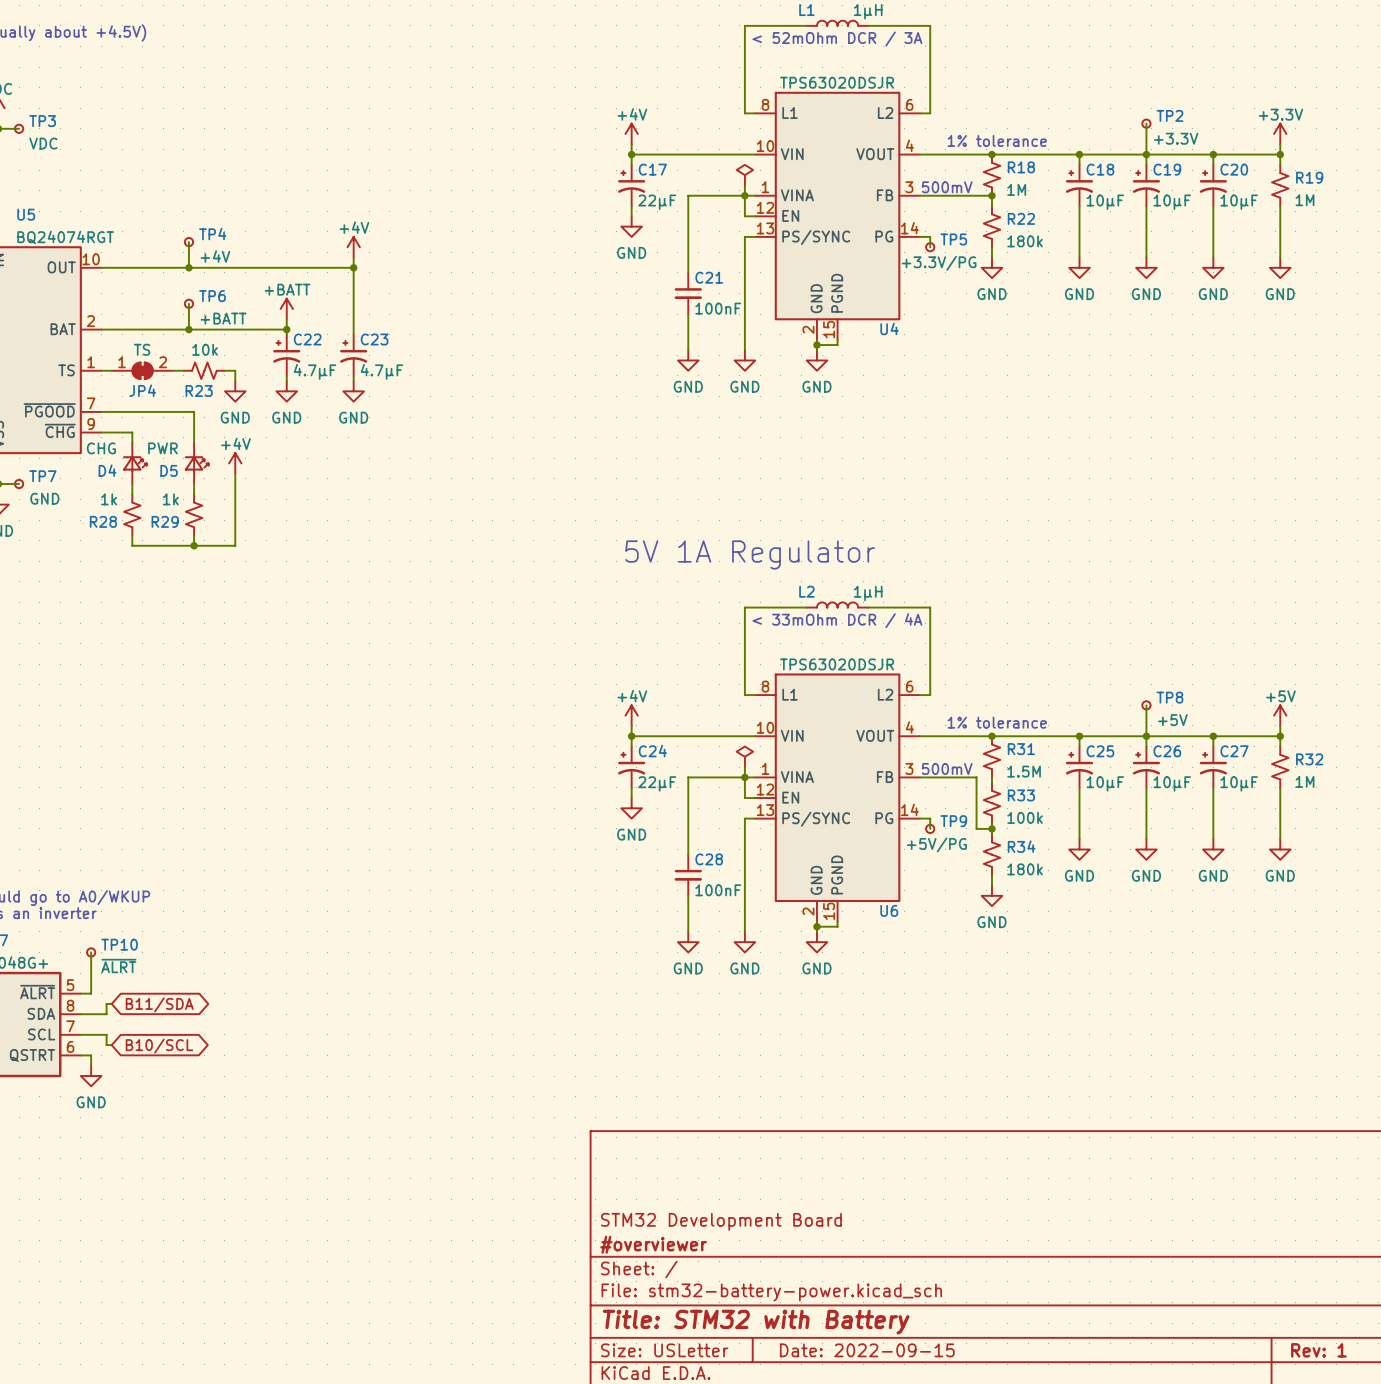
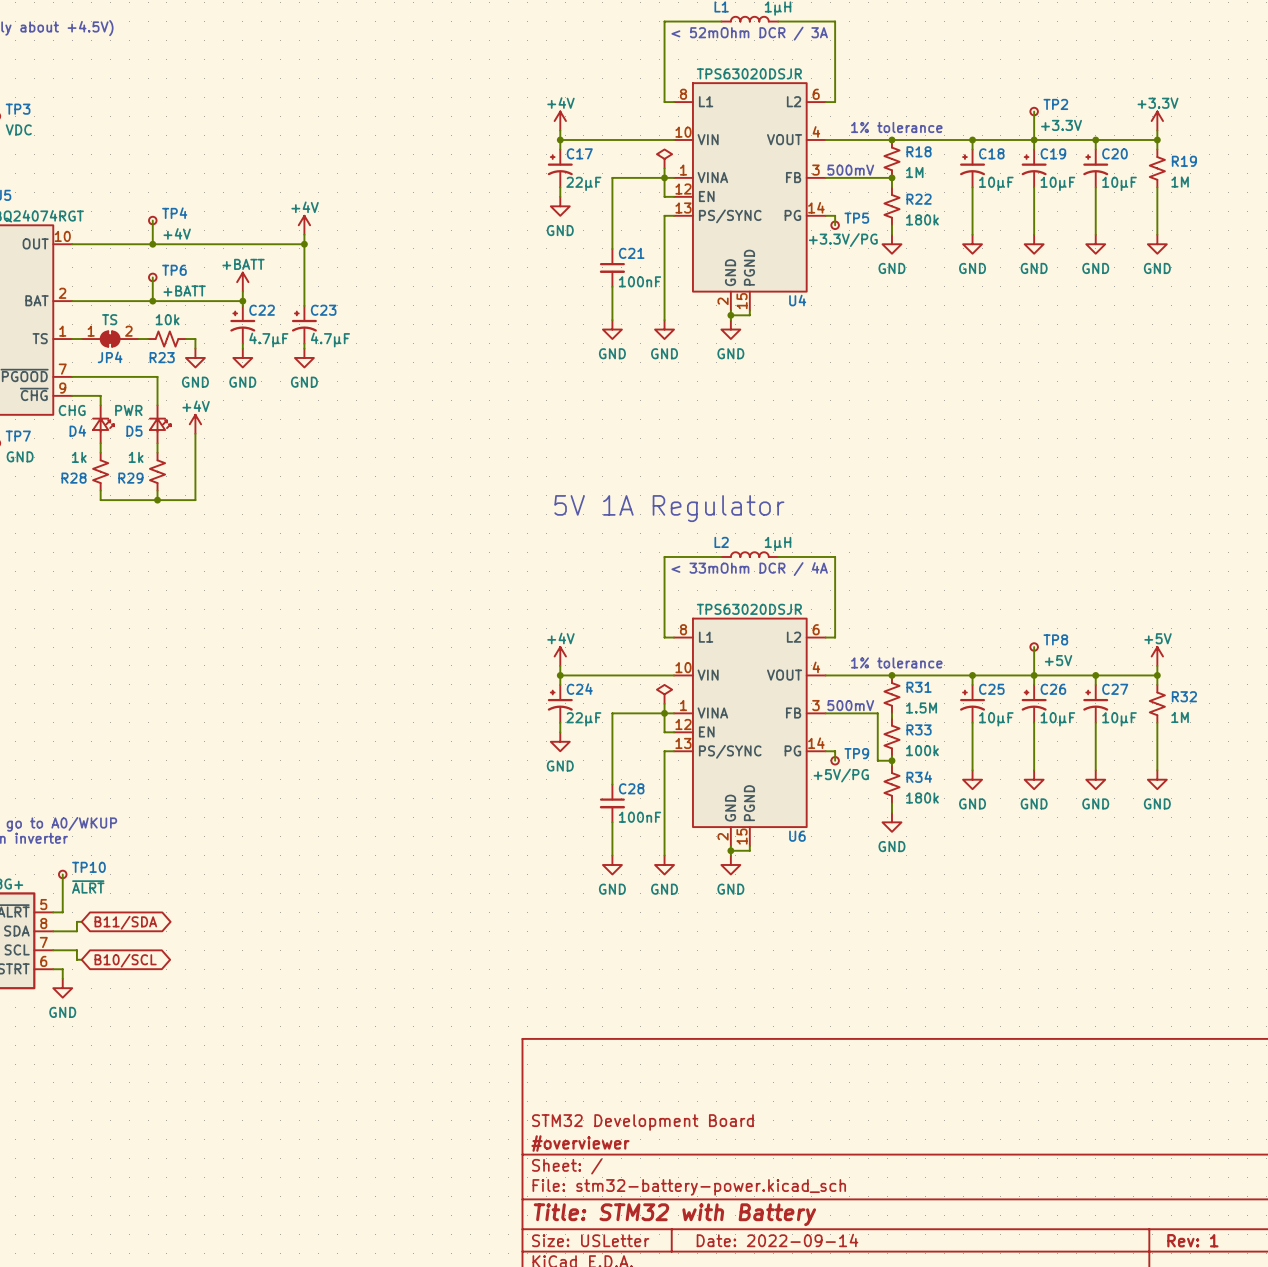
title block: Date: 2022-09-15 (867, 1350) -> Date: 2022-09-14 (777, 1240)

